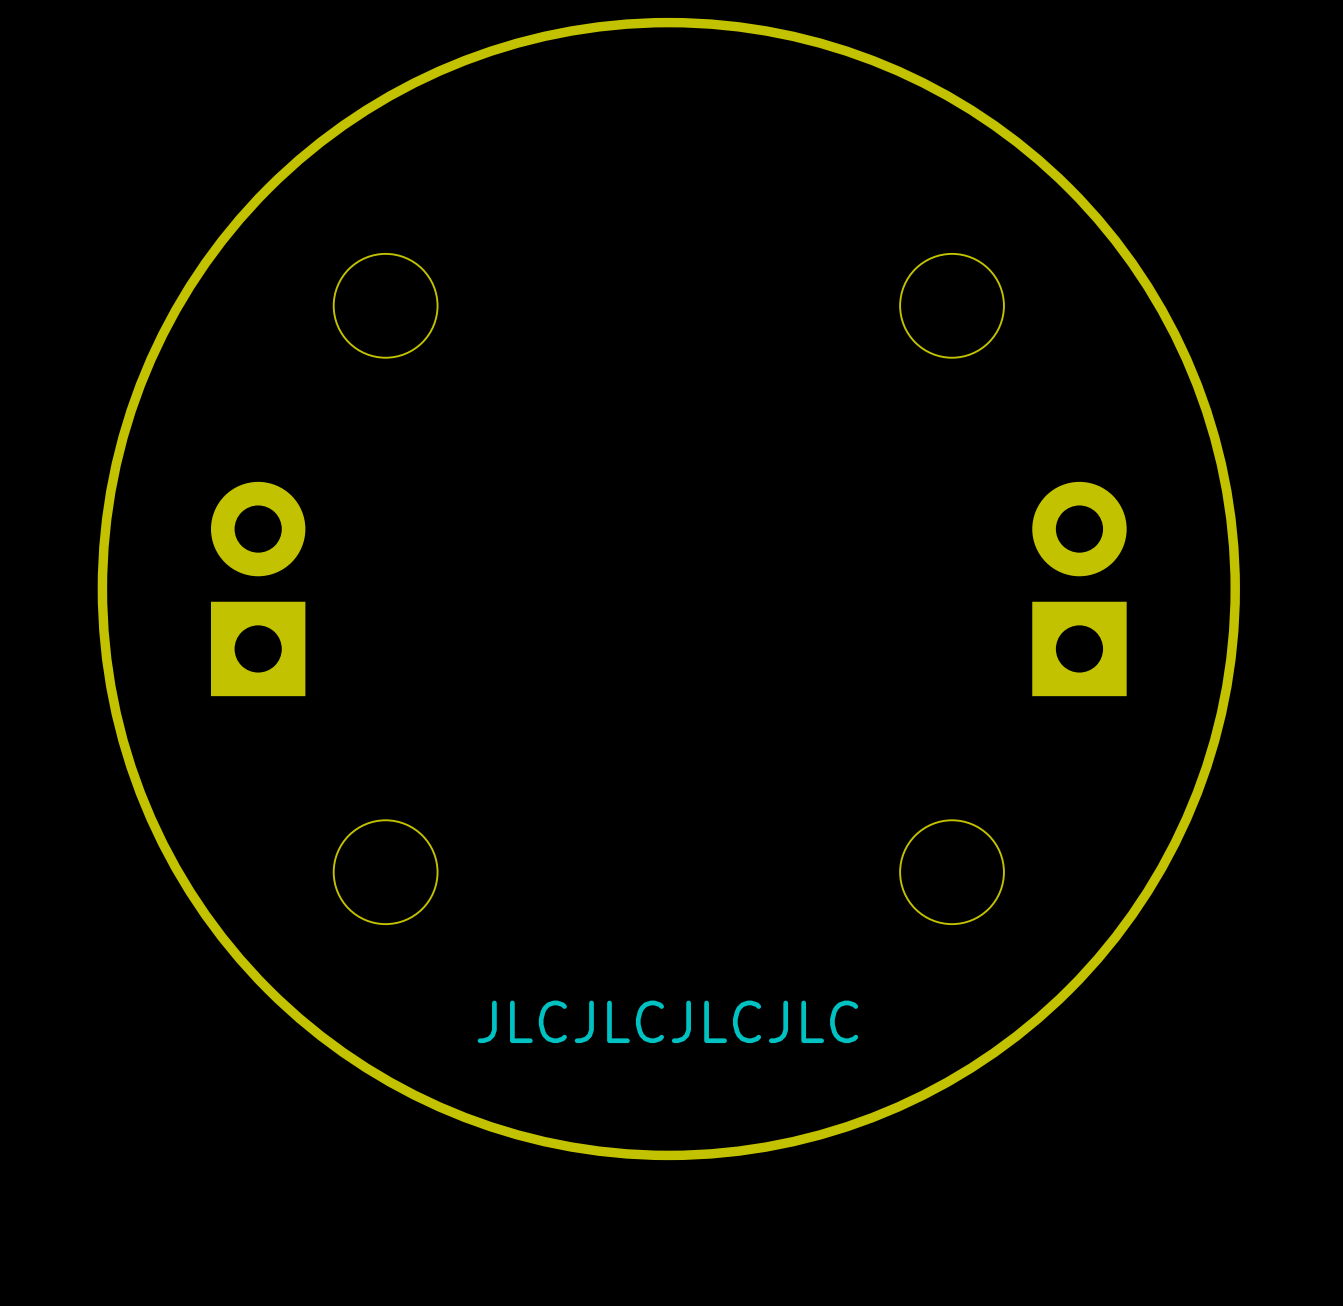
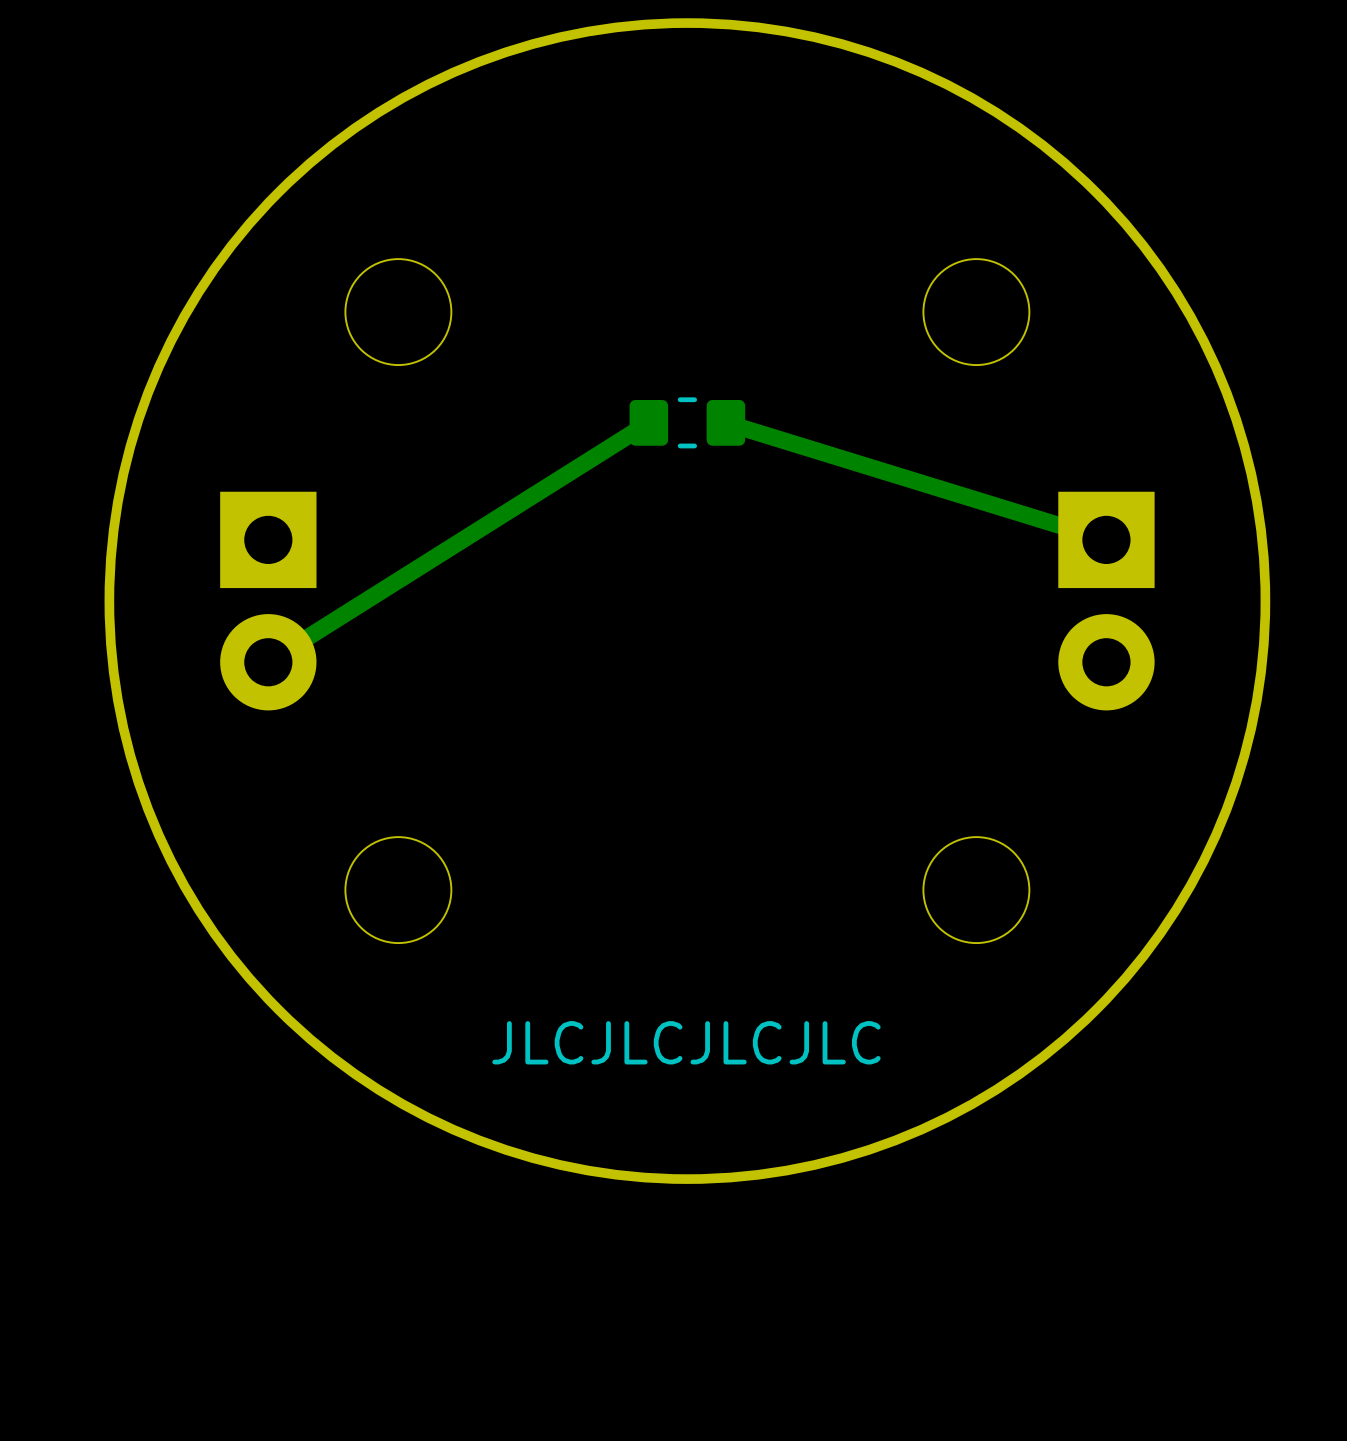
track: none -> (648, 422) (268, 662)
part: none -> (687, 422)
track: none -> (725, 422) (1106, 539)
part rotation: 0° (258, 589) -> 180° (268, 601)
part rotation: 0° (1079, 589) -> 180° (1106, 601)

